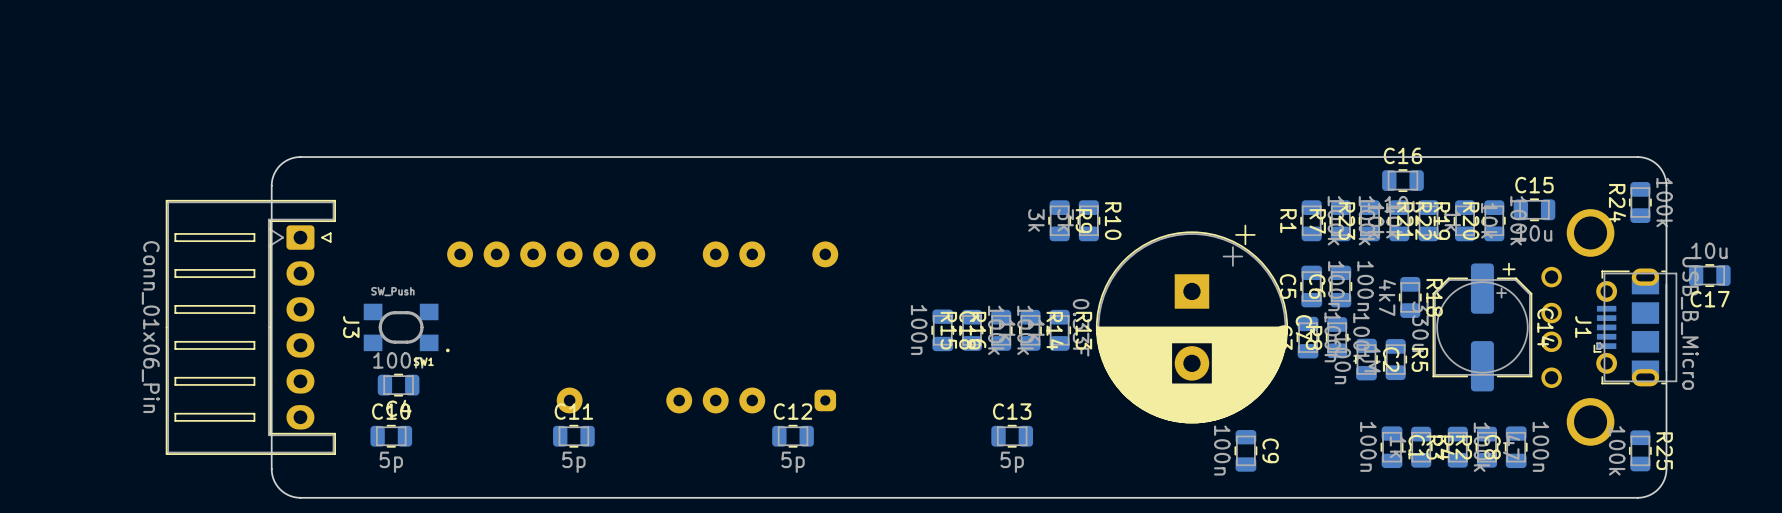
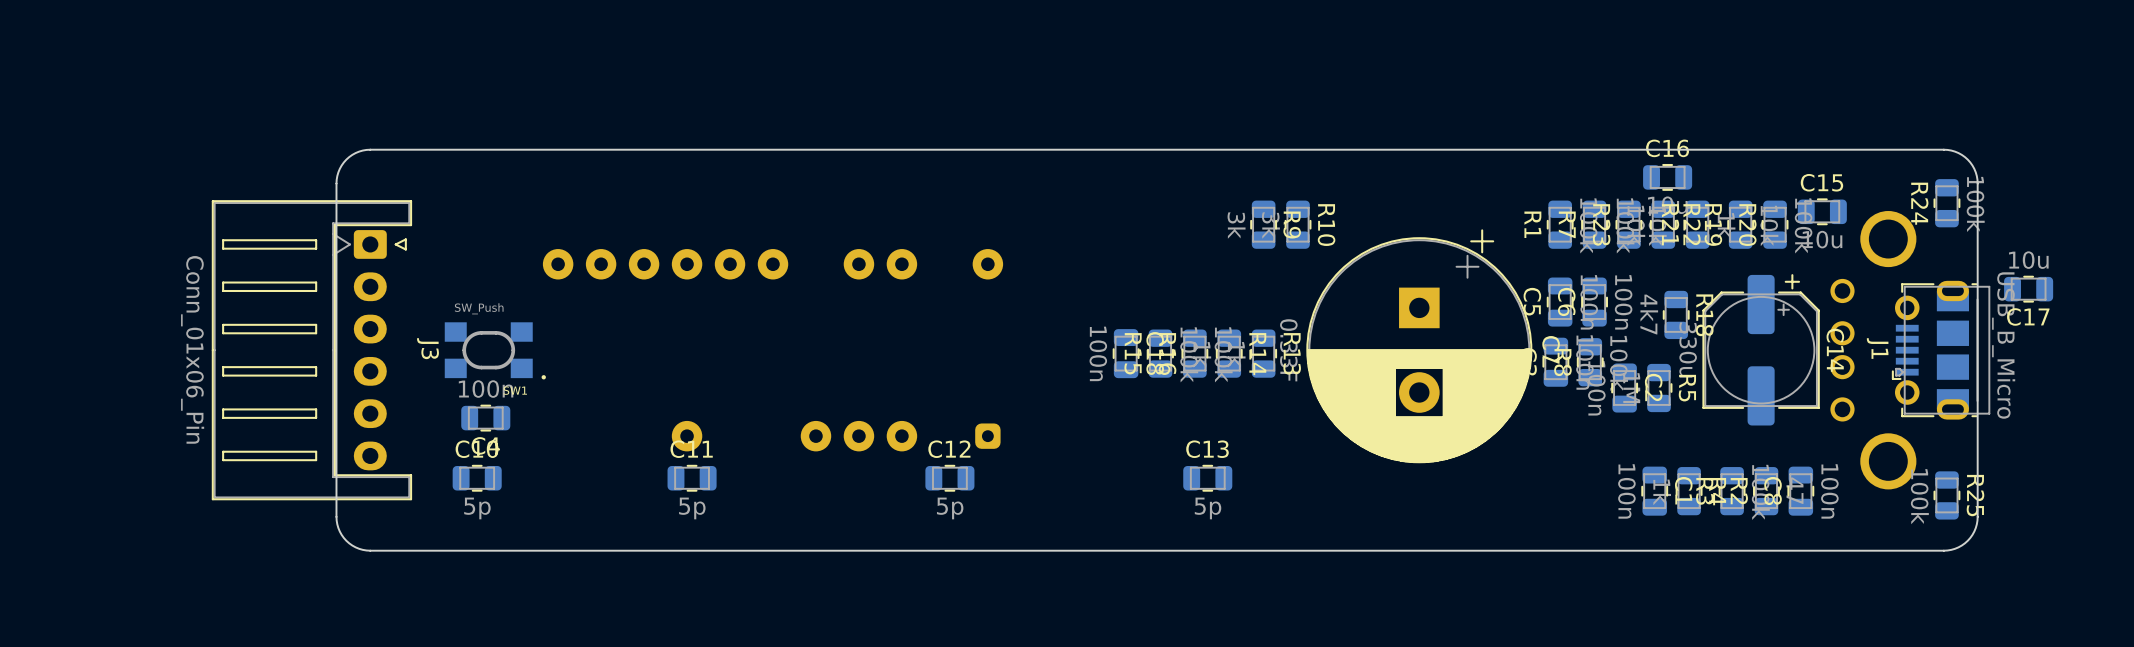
C9: 100n (1245, 450) -> none

